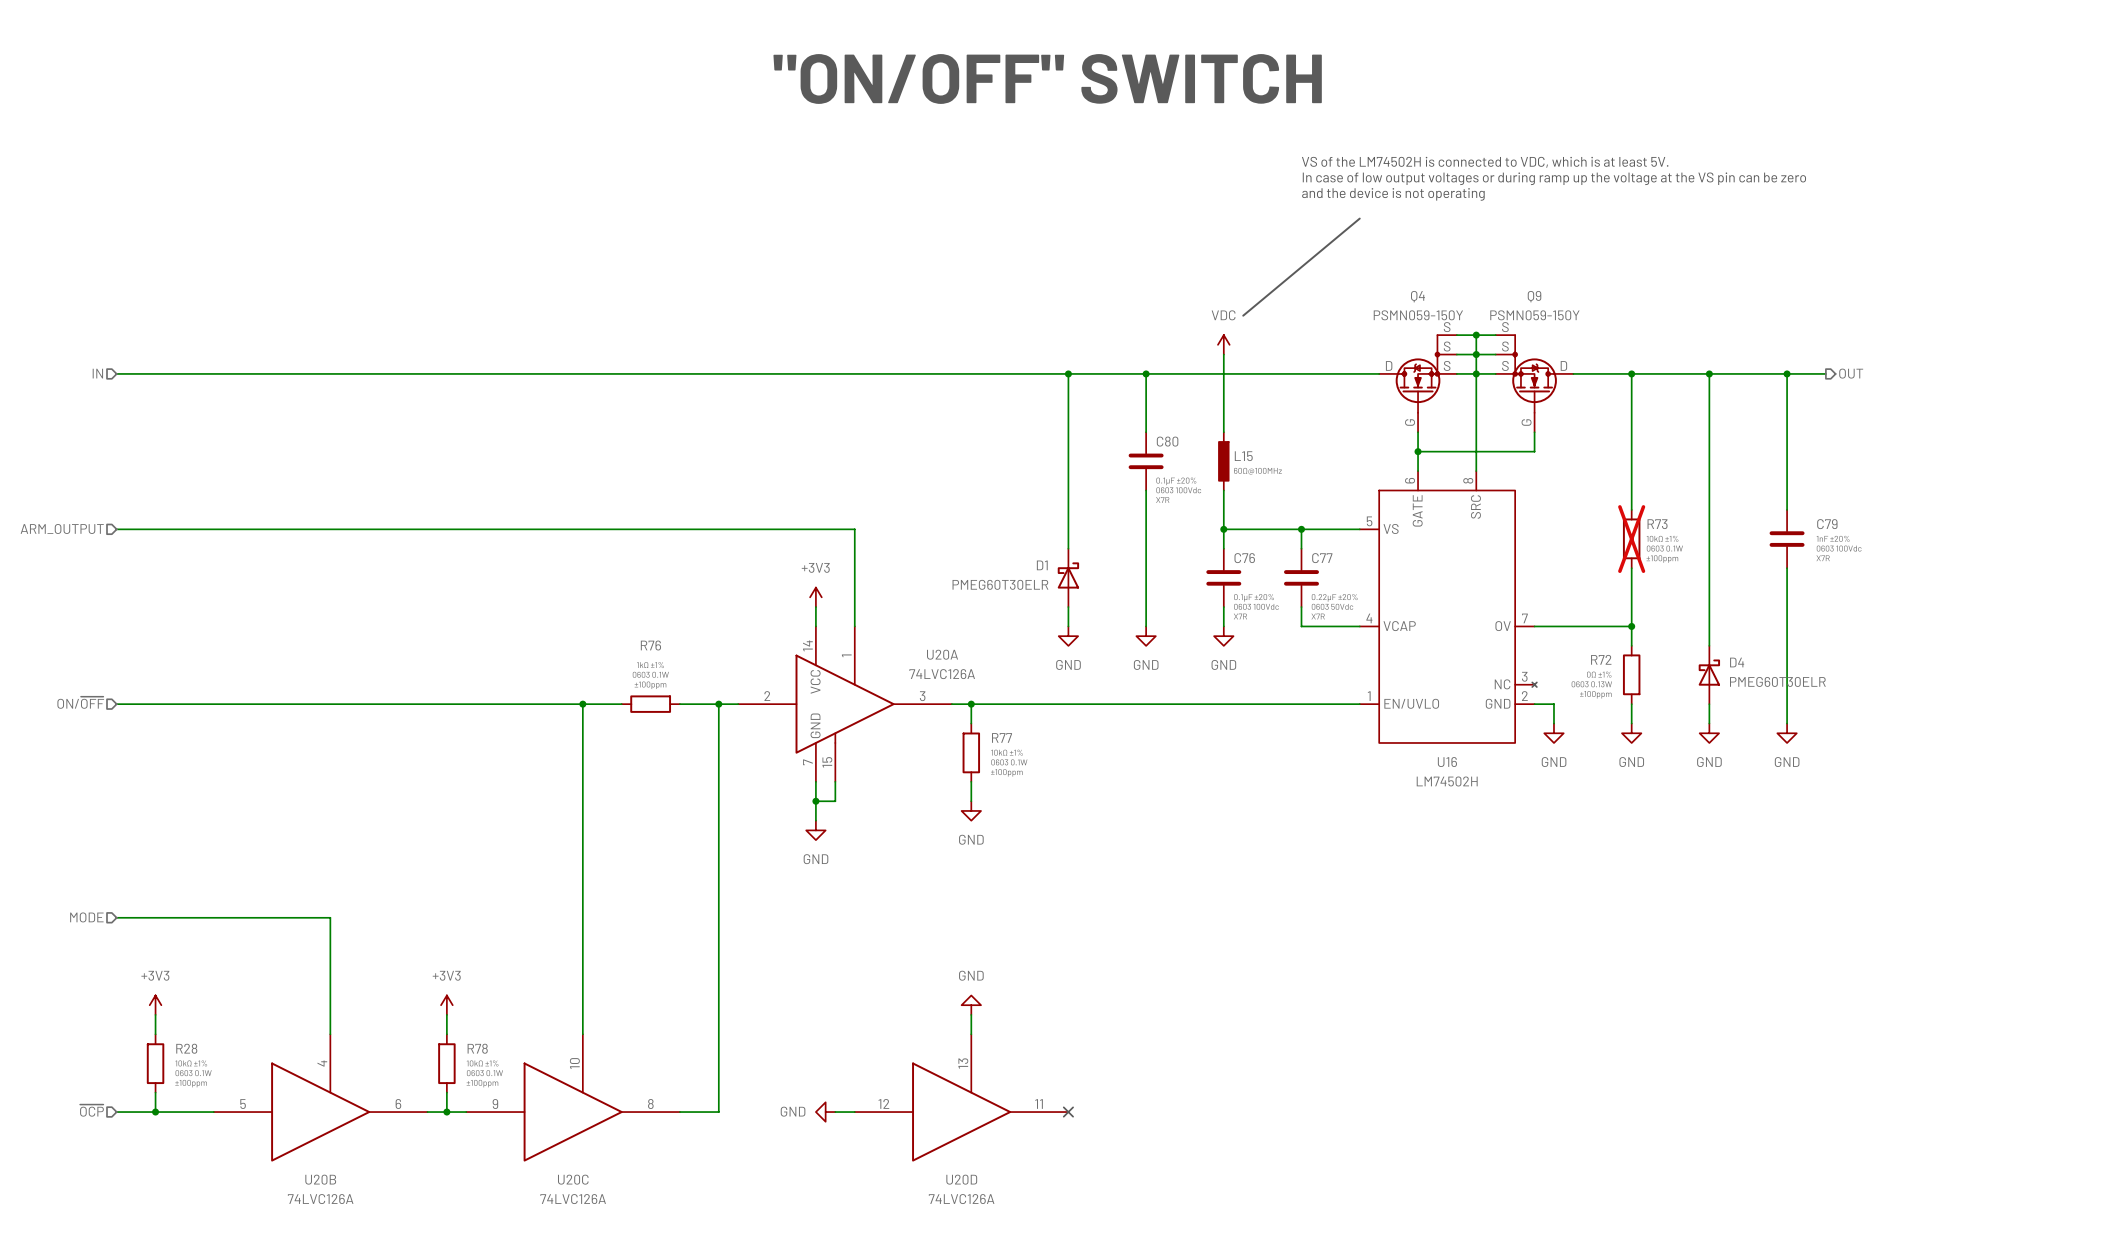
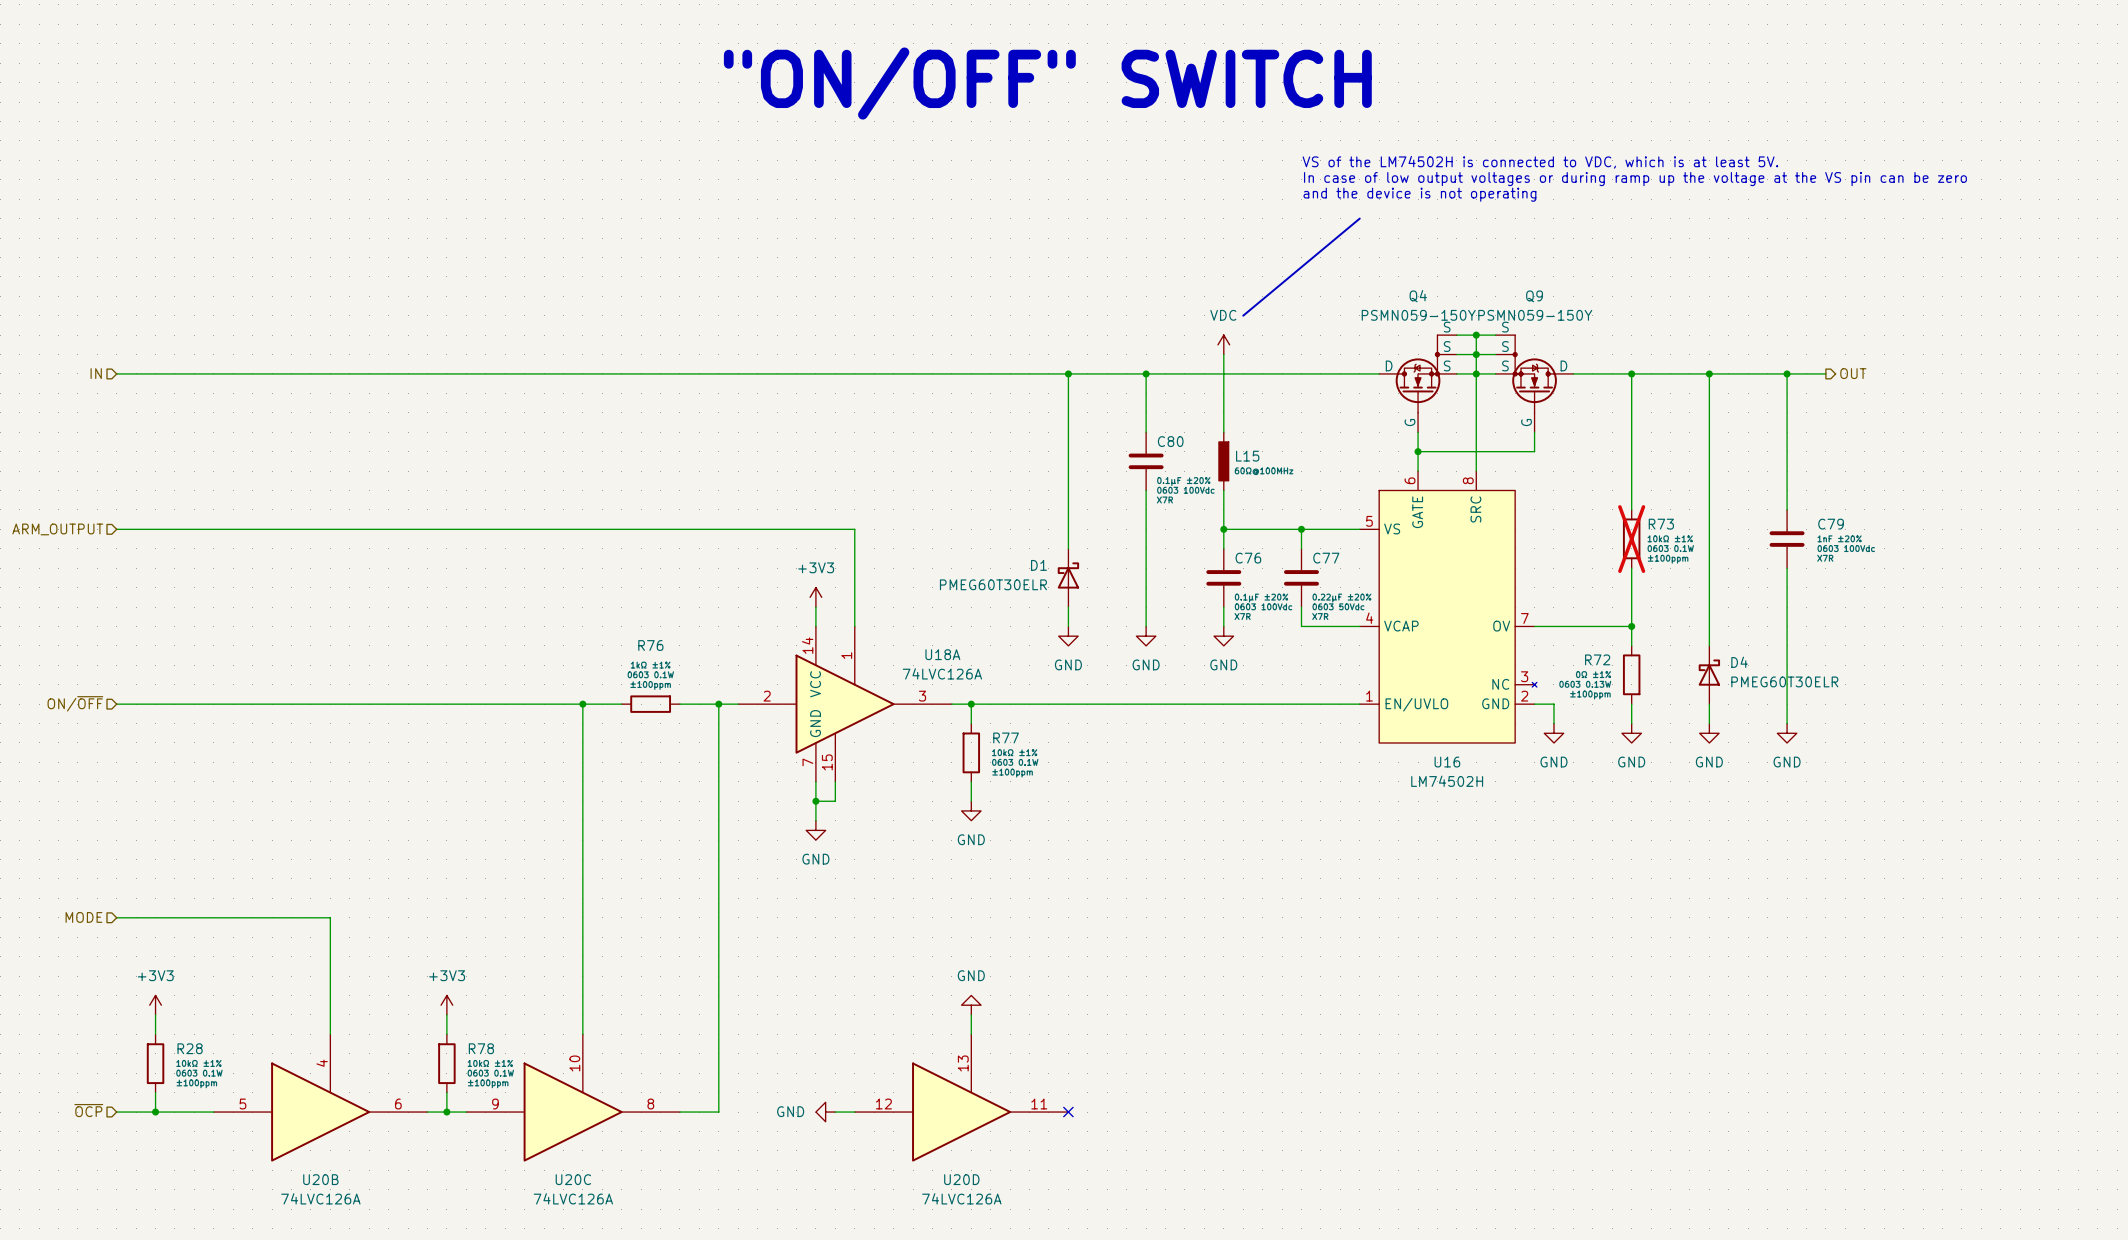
U20A name: U20A (942, 654) -> U18A (942, 654)

